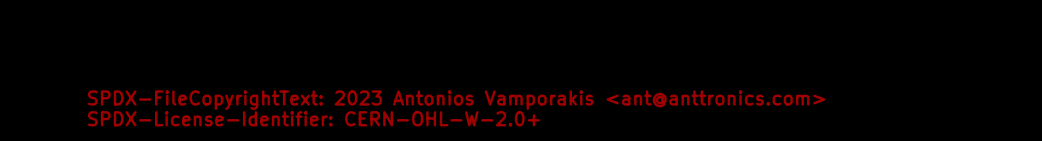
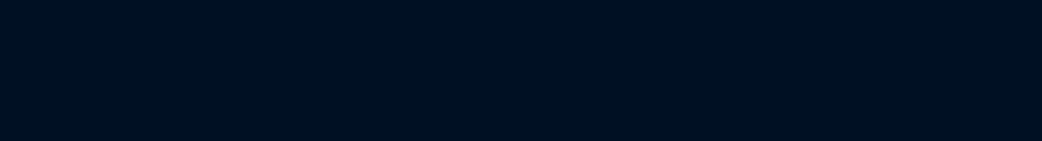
text: SPDX-FileCopyrightText: 2023 Antonios Vamporakis <ant@anttronics.com> (456, 100) -> none
text: SPDX-License-Identifier: CERN-OHL-W-2.0+ (313, 118) -> none

